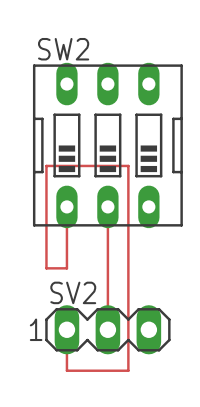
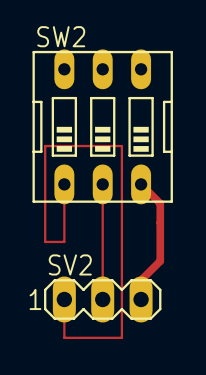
top track: none -> (141, 184) (160, 203) (160, 261) (141, 280) (141, 299)

